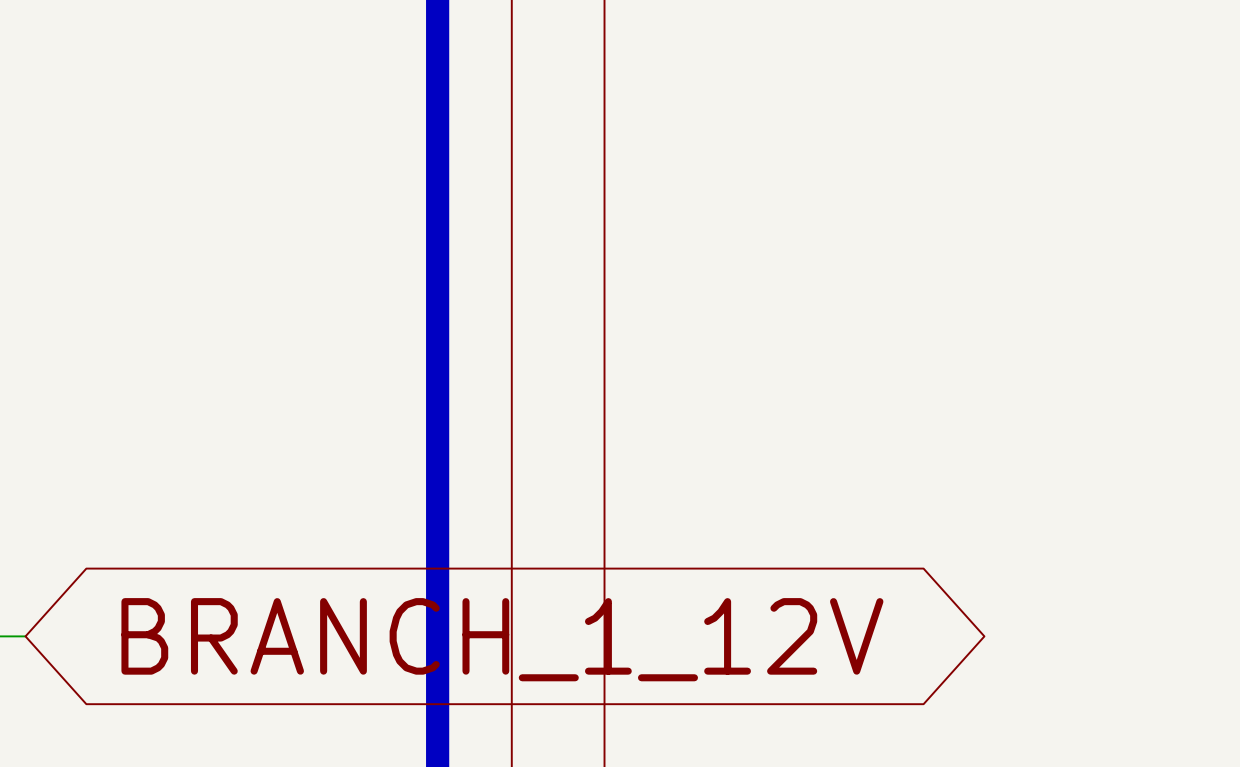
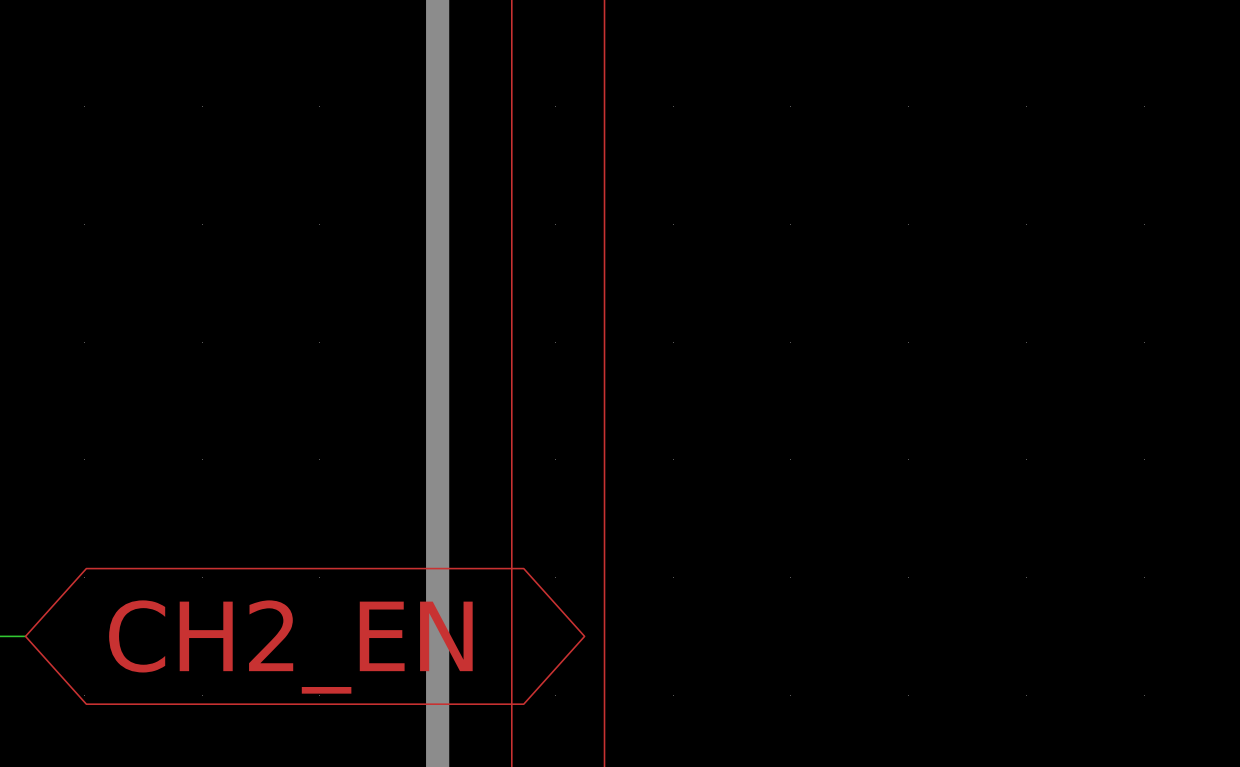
global label: BRANCH_1_12V (502, 639) -> CH2_EN (290, 647)

